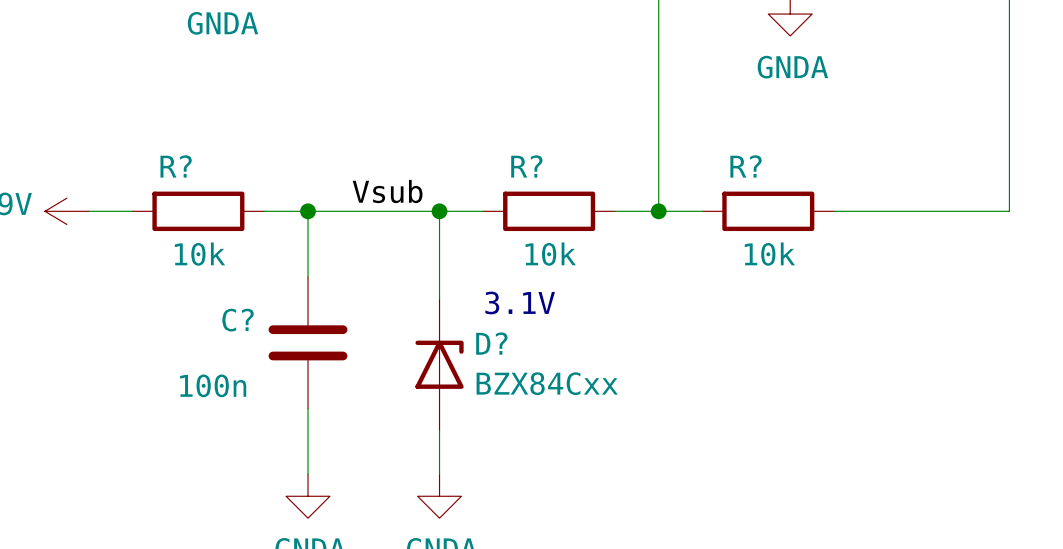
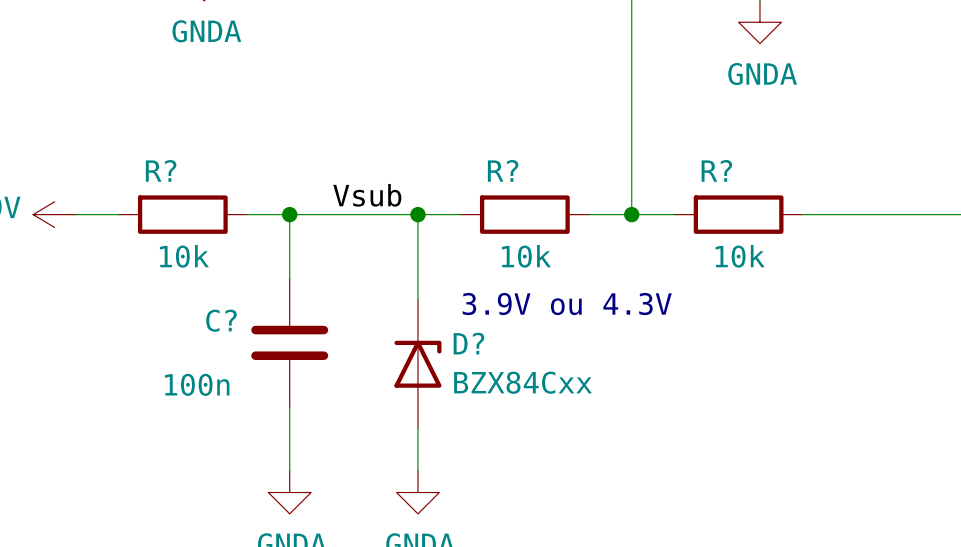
text: 3.1V (520, 302) -> 3.9V ou 4.3V (567, 304)

